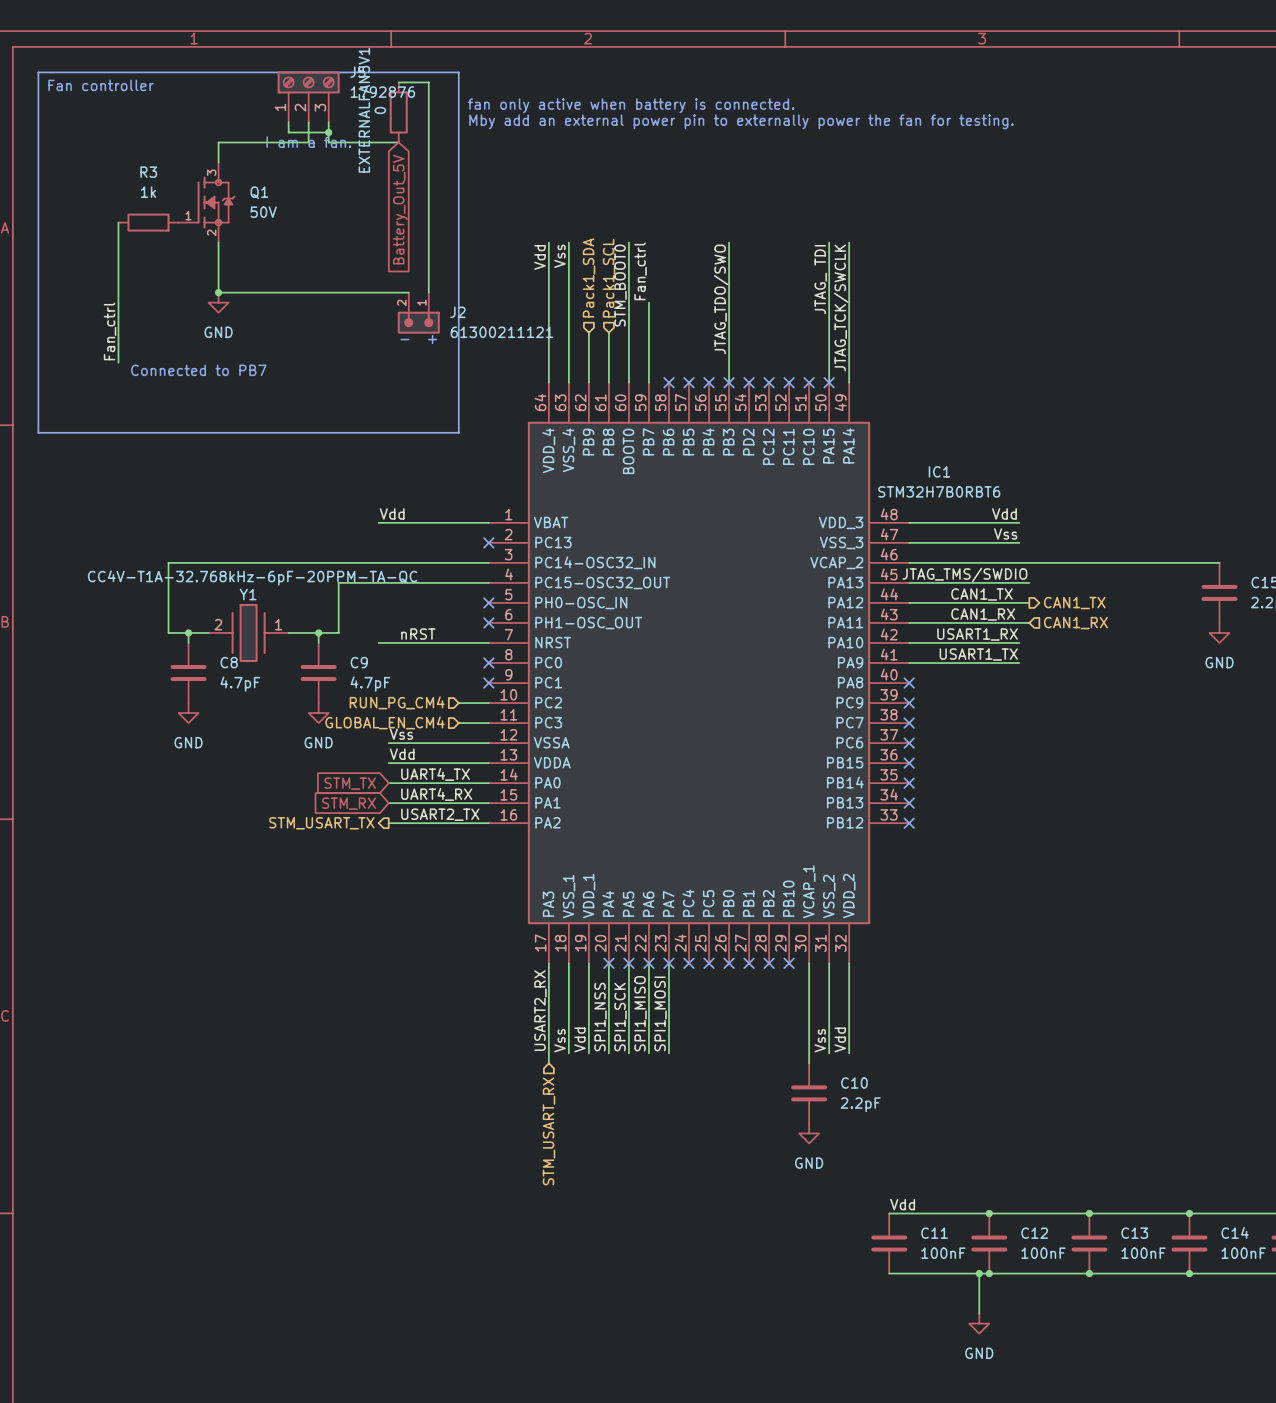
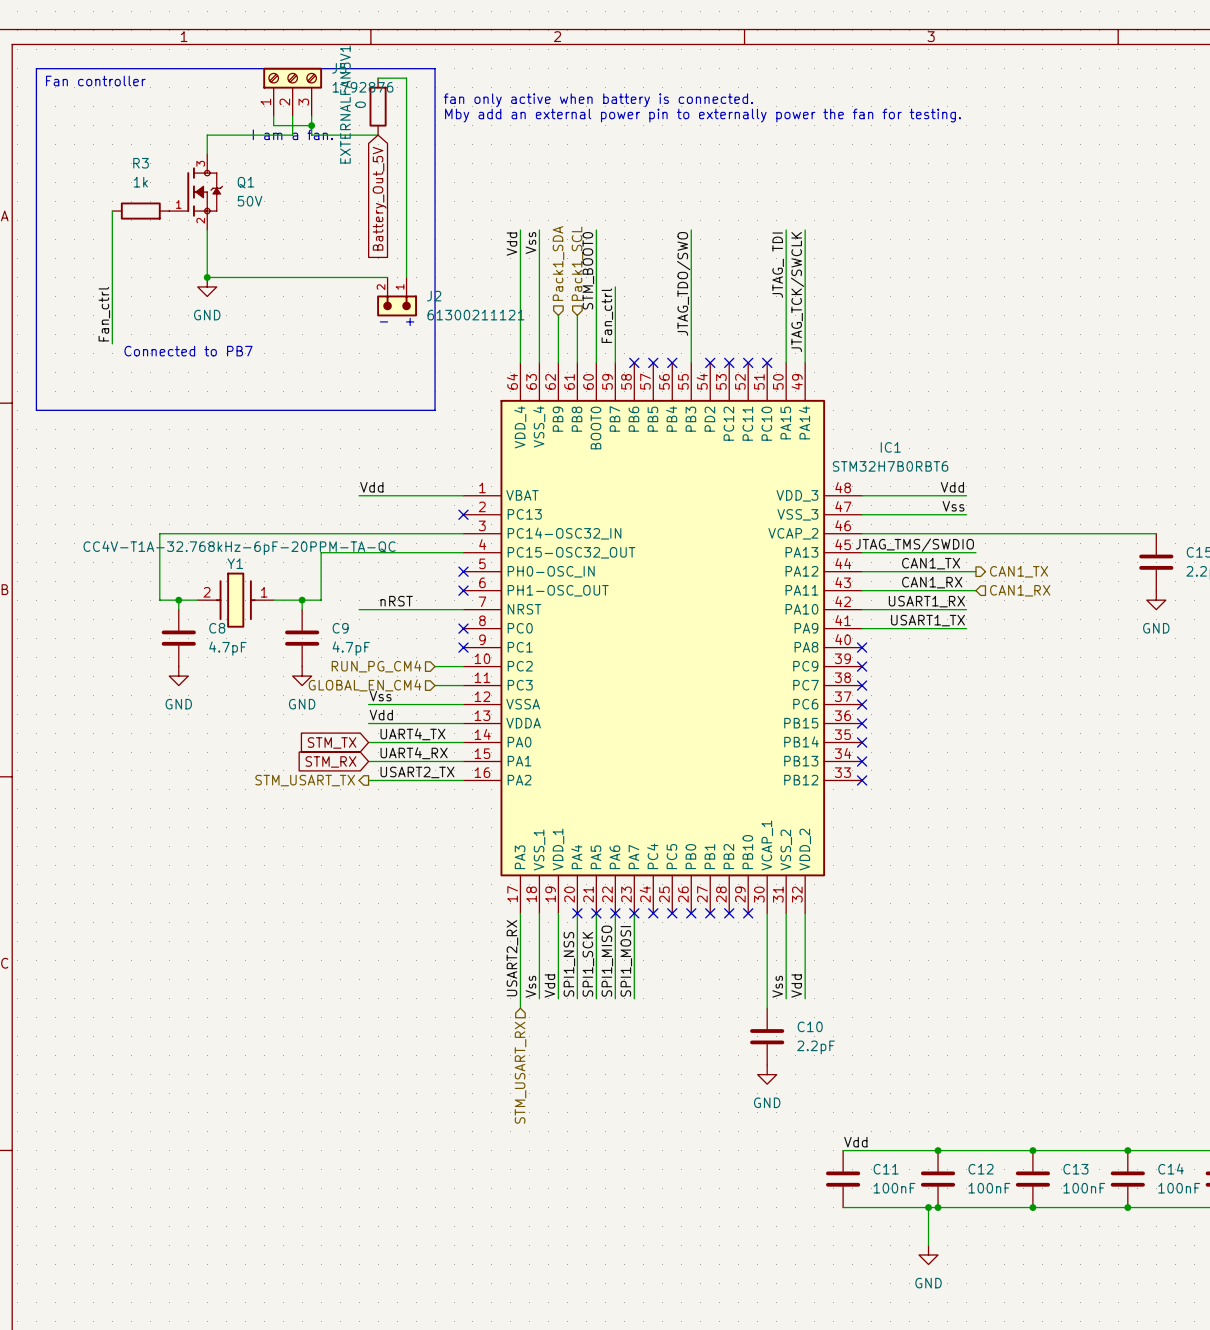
label position: Fan_ctrl (640, 271) -> Fan_ctrl (607, 315)
no-connect mark: (729, 382) -> none
no-connect mark: (829, 382) -> none

